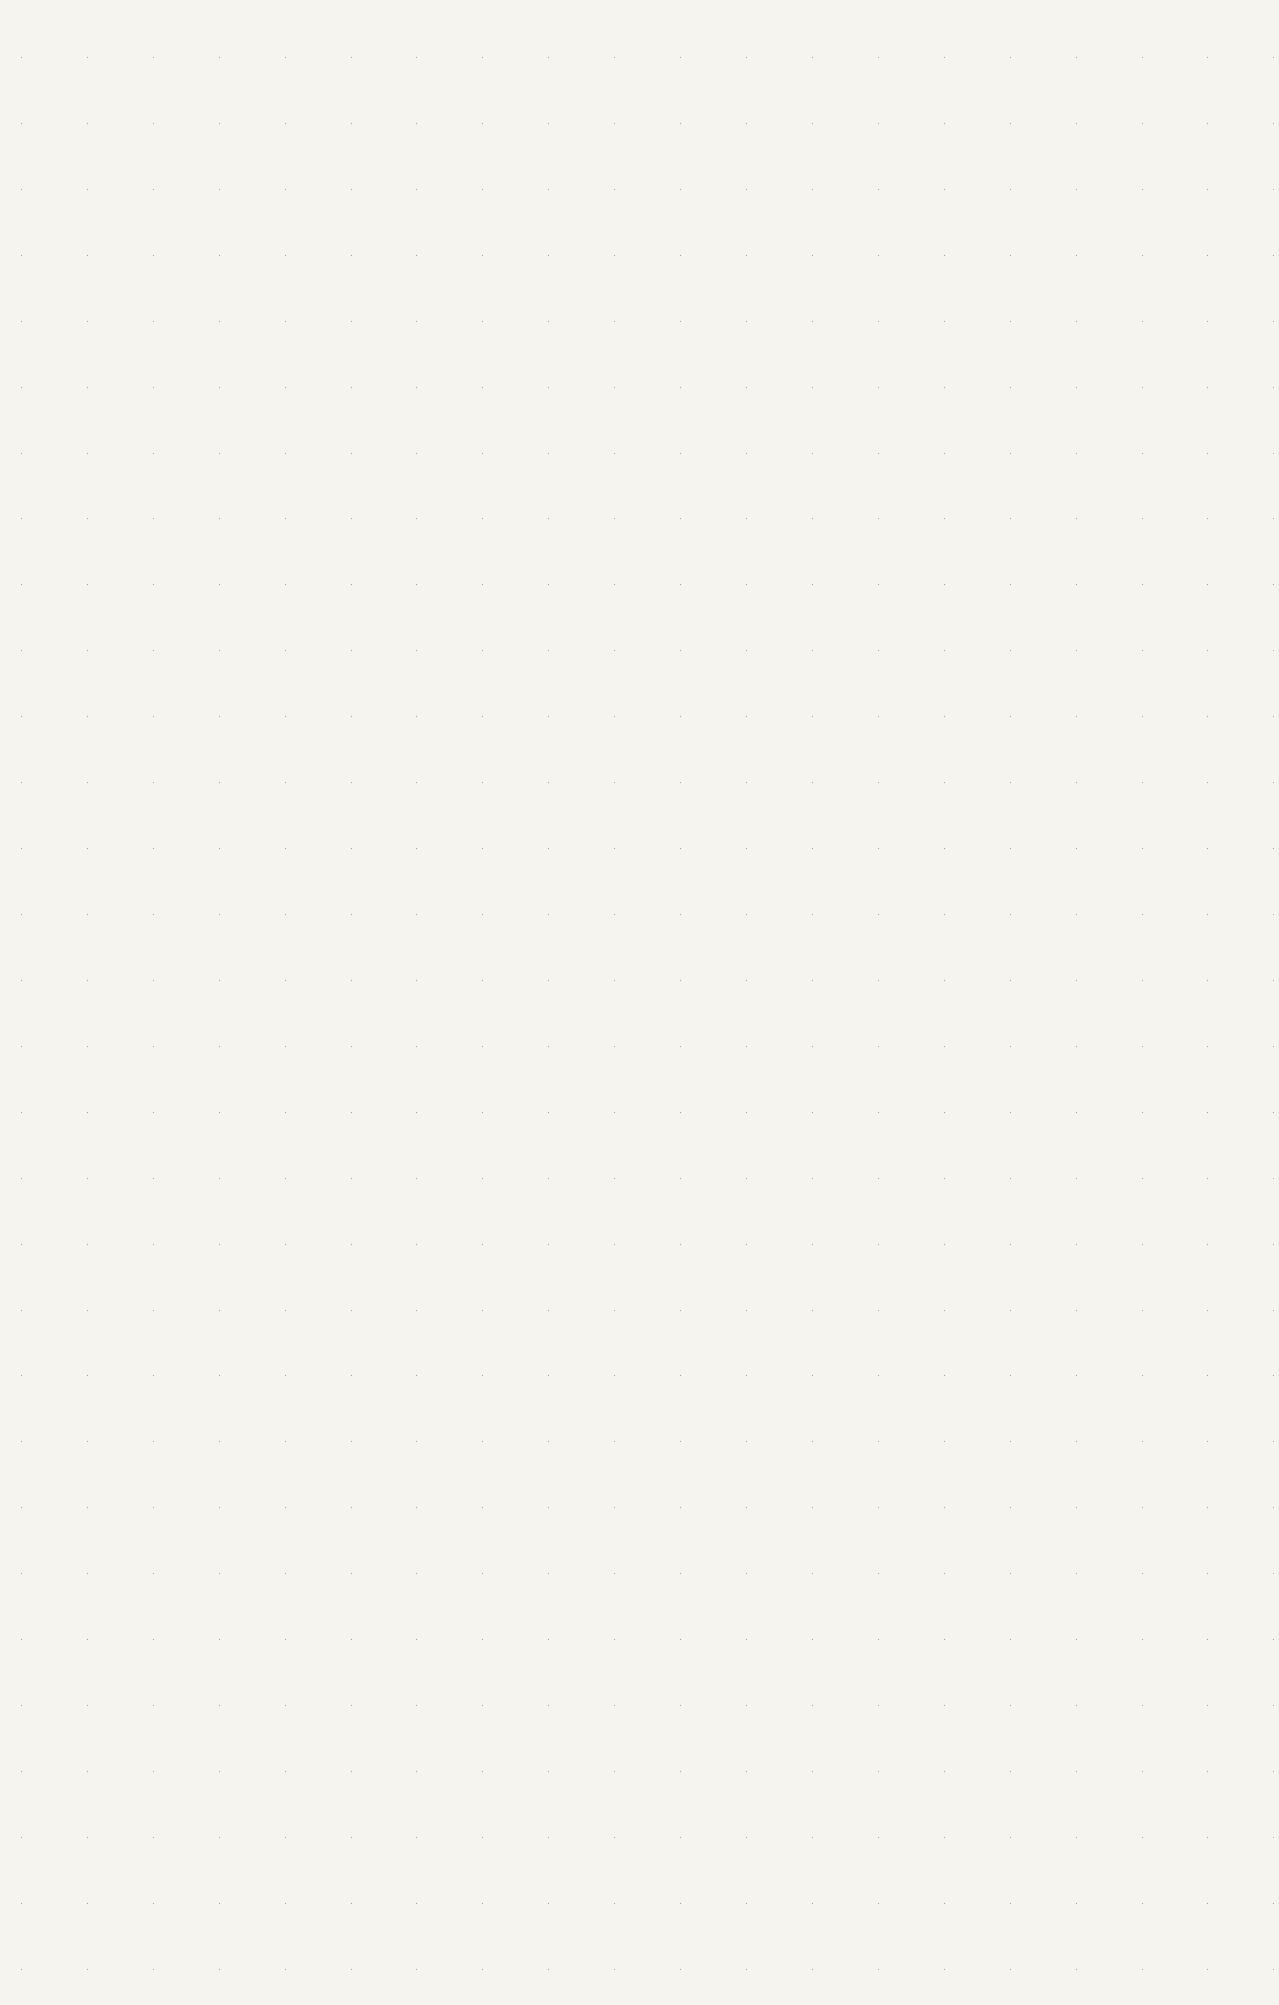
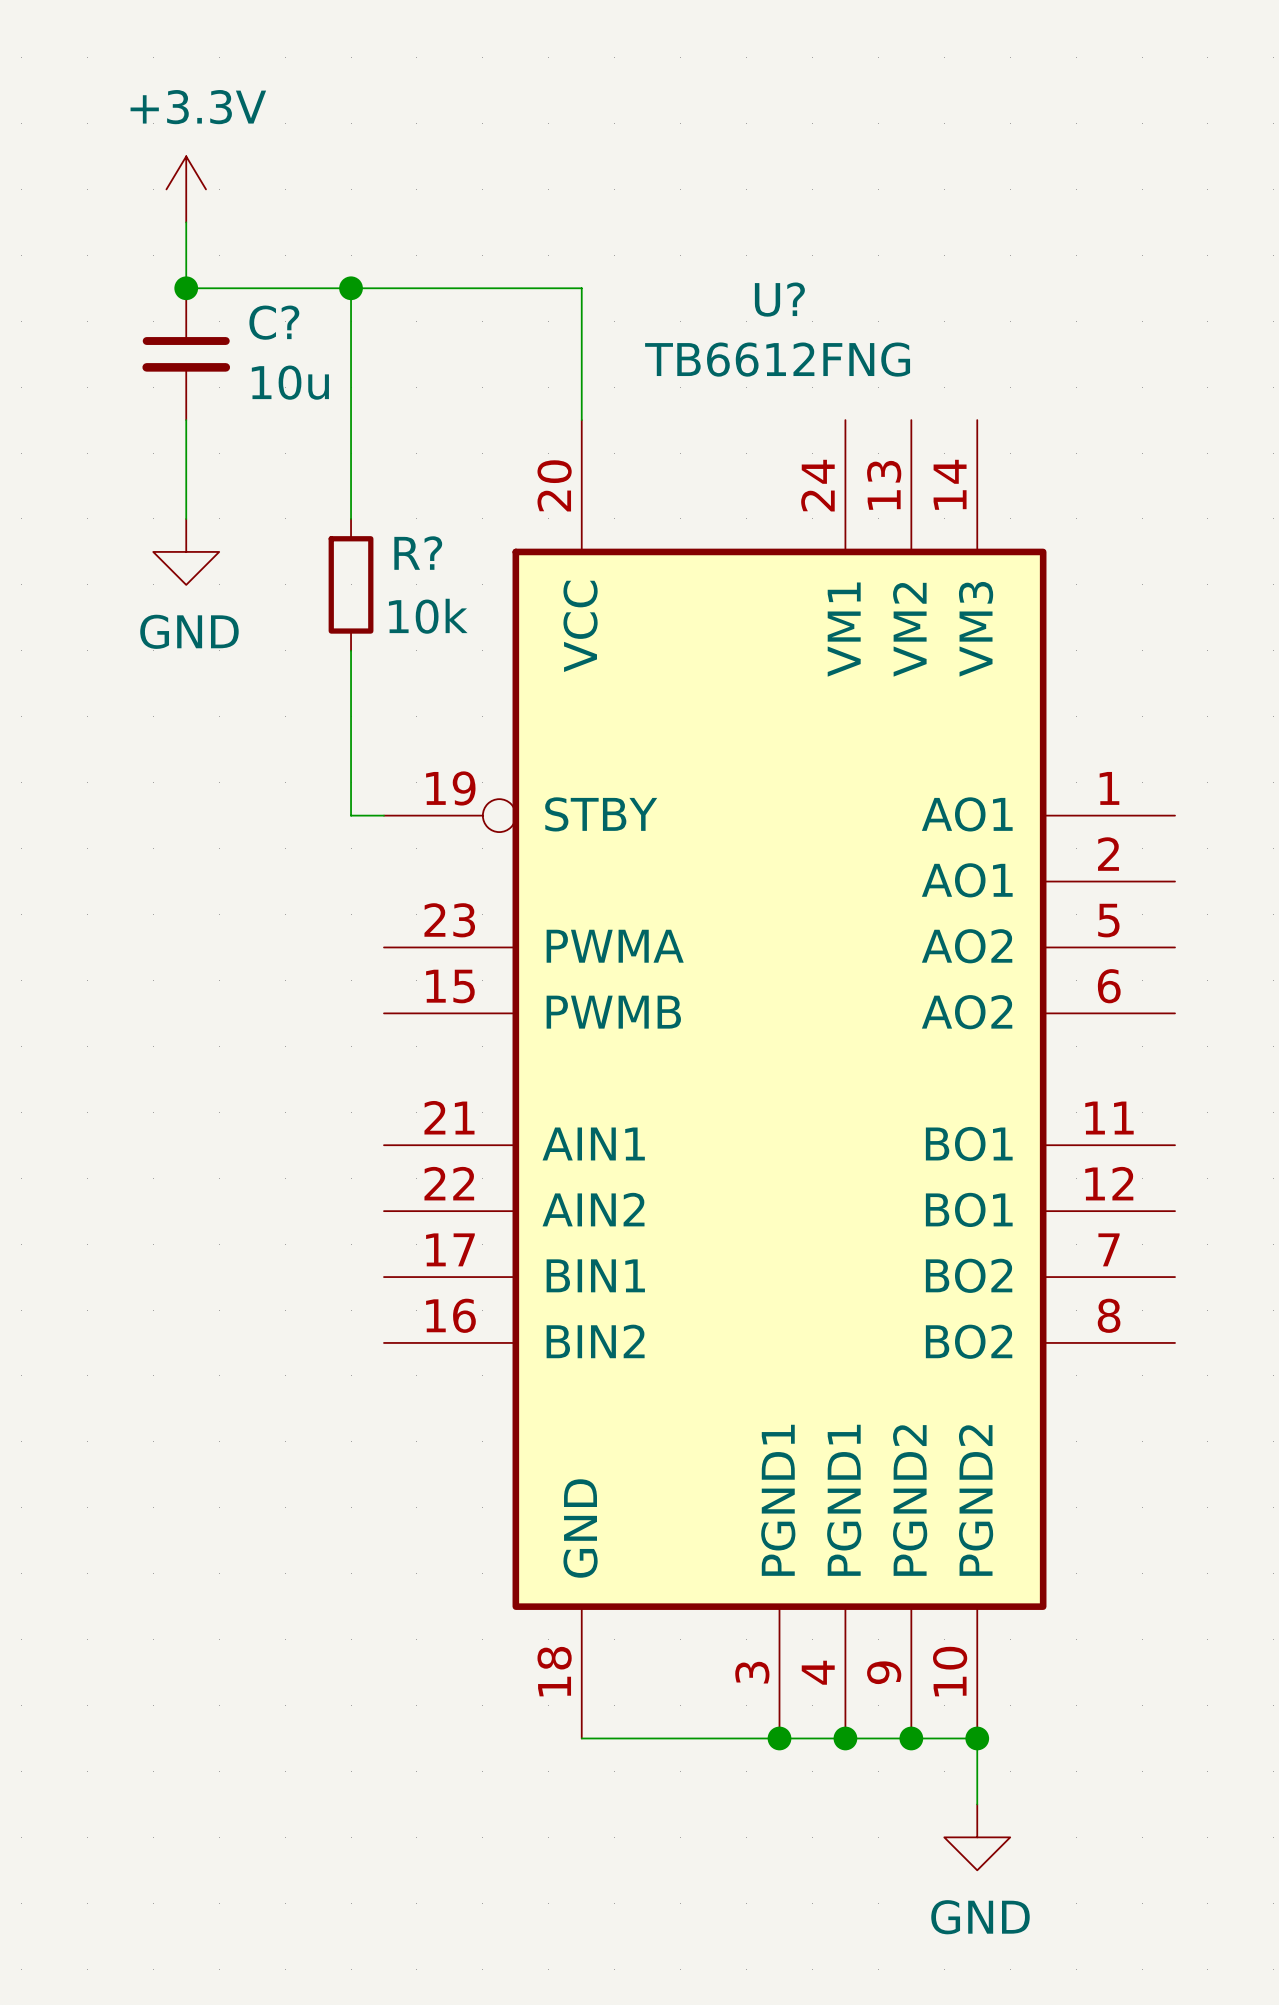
power symbol: none -> +3.3V (186, 189)
wire: none -> (186, 222) (186, 288) (581, 288) (581, 420)
junction: none -> (186, 288)
wire: none -> (351, 288) (351, 518)
junction: none -> (351, 288)
C?: none -> 10u (186, 354)
wire: none -> (186, 420) (186, 518)
power symbol: none -> GND (186, 551)
R?: none -> 10k (351, 584)
wire: none -> (351, 650) (351, 815) (383, 815)
U?: none -> TB6612FNG (779, 1079)
wire: none -> (581, 1738) (977, 1738) (977, 1804)
junction: none -> (779, 1738)
junction: none -> (845, 1738)
junction: none -> (911, 1738)
junction: none -> (977, 1738)
power symbol: none -> GND (977, 1837)

